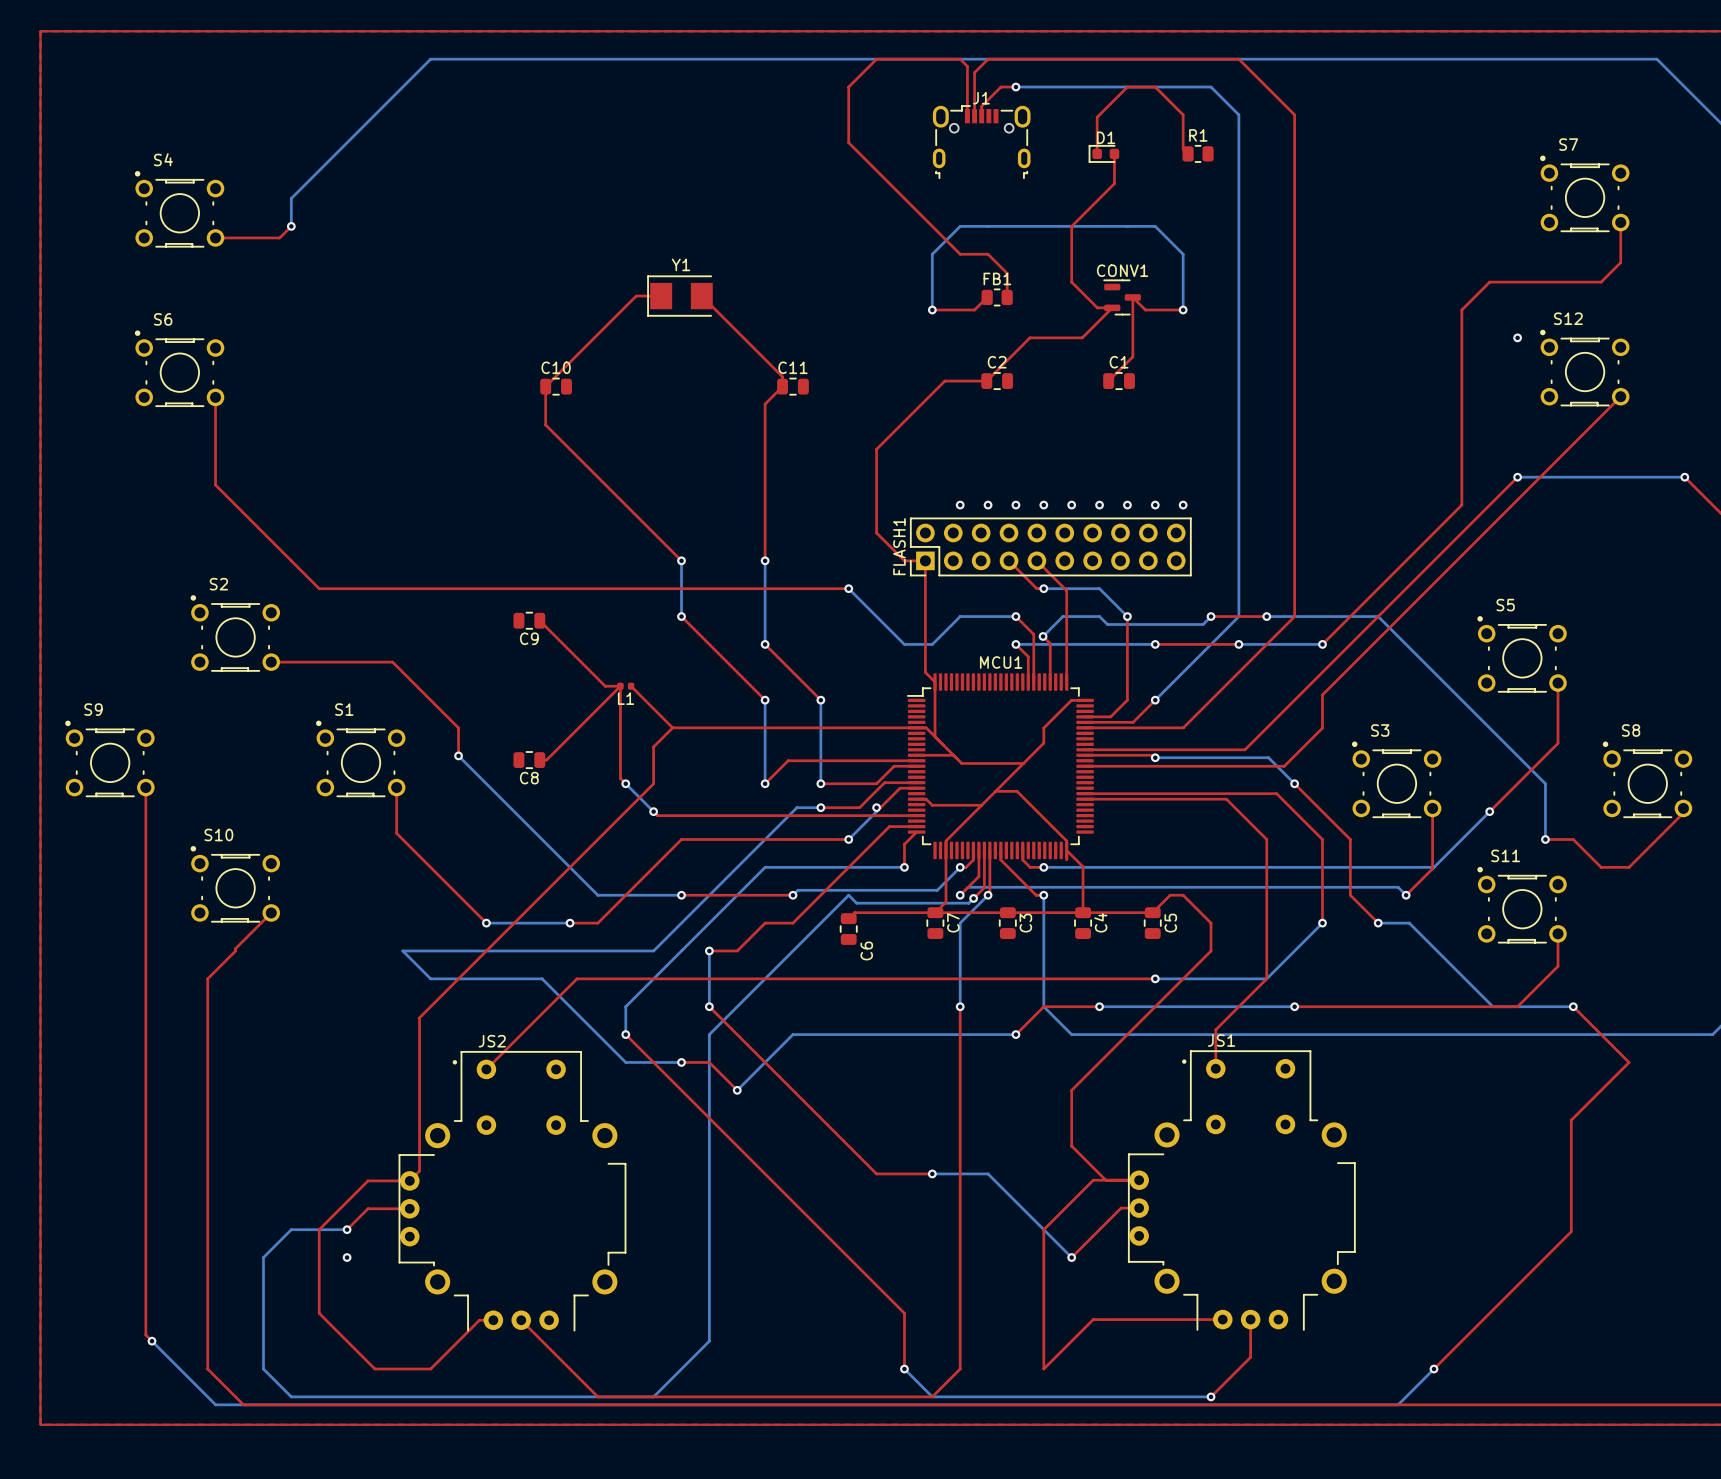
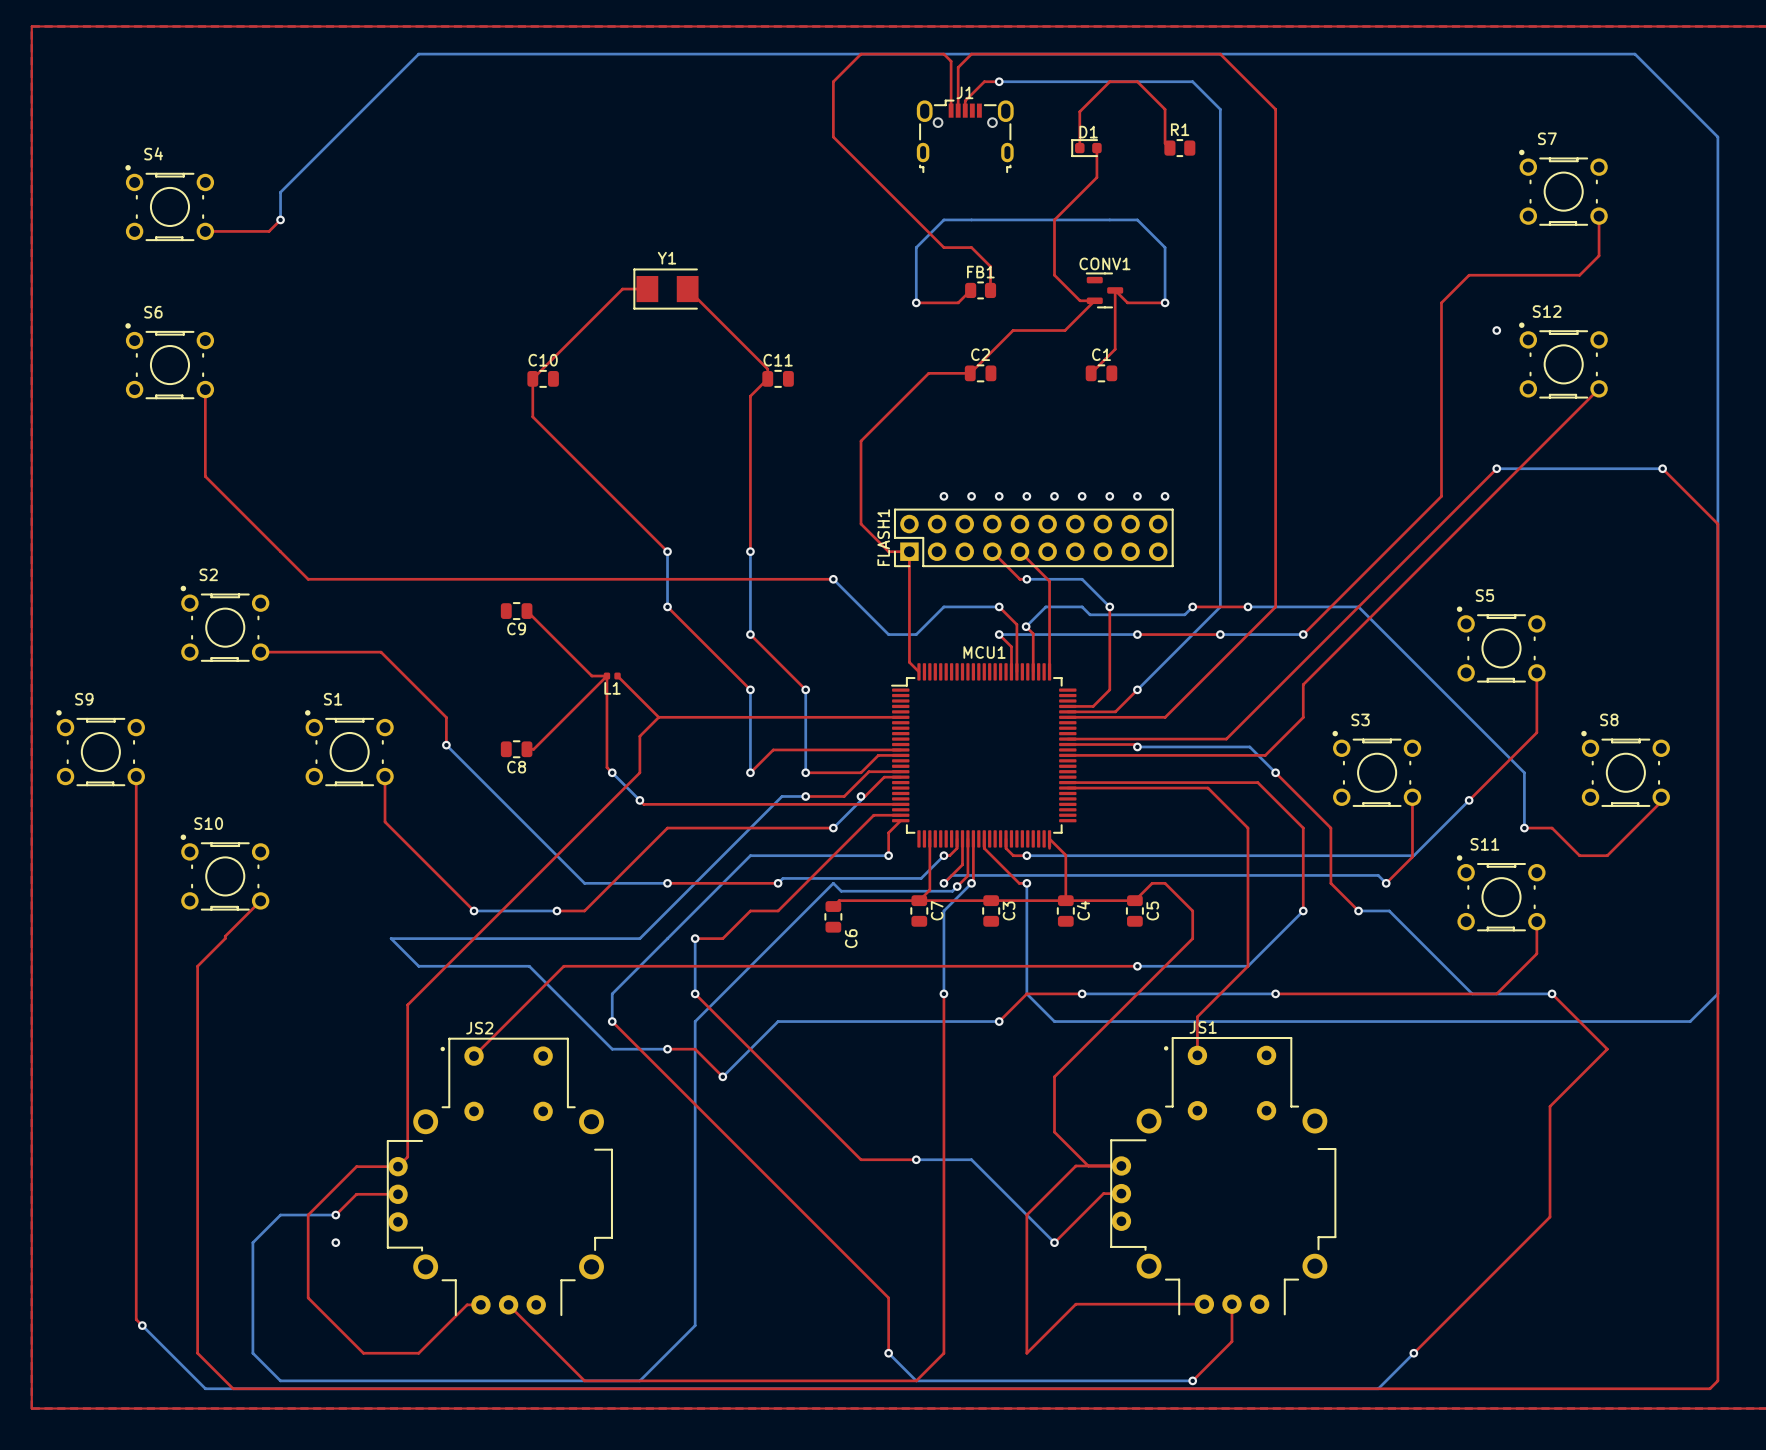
top track: (935, 682) (935, 736) -> none
top track: (1085, 700) (1071, 700) (1043, 728) (1043, 743) (946, 840) (946, 850) -> none
top track: (916, 727) (926, 727) (961, 763) (1023, 763) -> none
top track: (916, 755) (953, 755) -> none
top track: (995, 791) (1017, 791) (1066, 840) (1066, 850) -> none
top track: (916, 799) (926, 799) (932, 805) (981, 805) -> none

